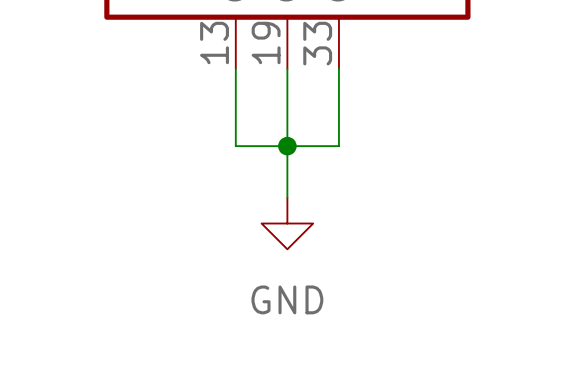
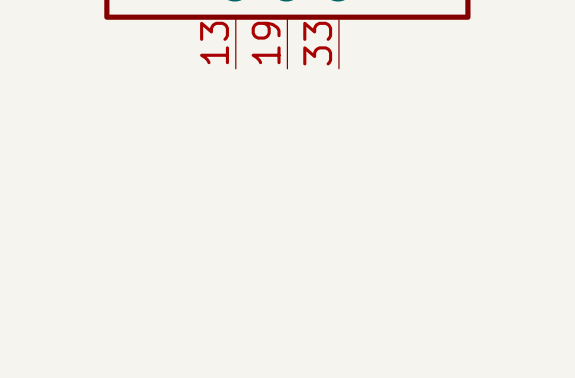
wire: (235, 68) (235, 146) (338, 146) (338, 68) -> none
wire: (287, 68) (287, 197) -> none
junction: (287, 146) -> none
power symbol: GND (287, 223) -> none

